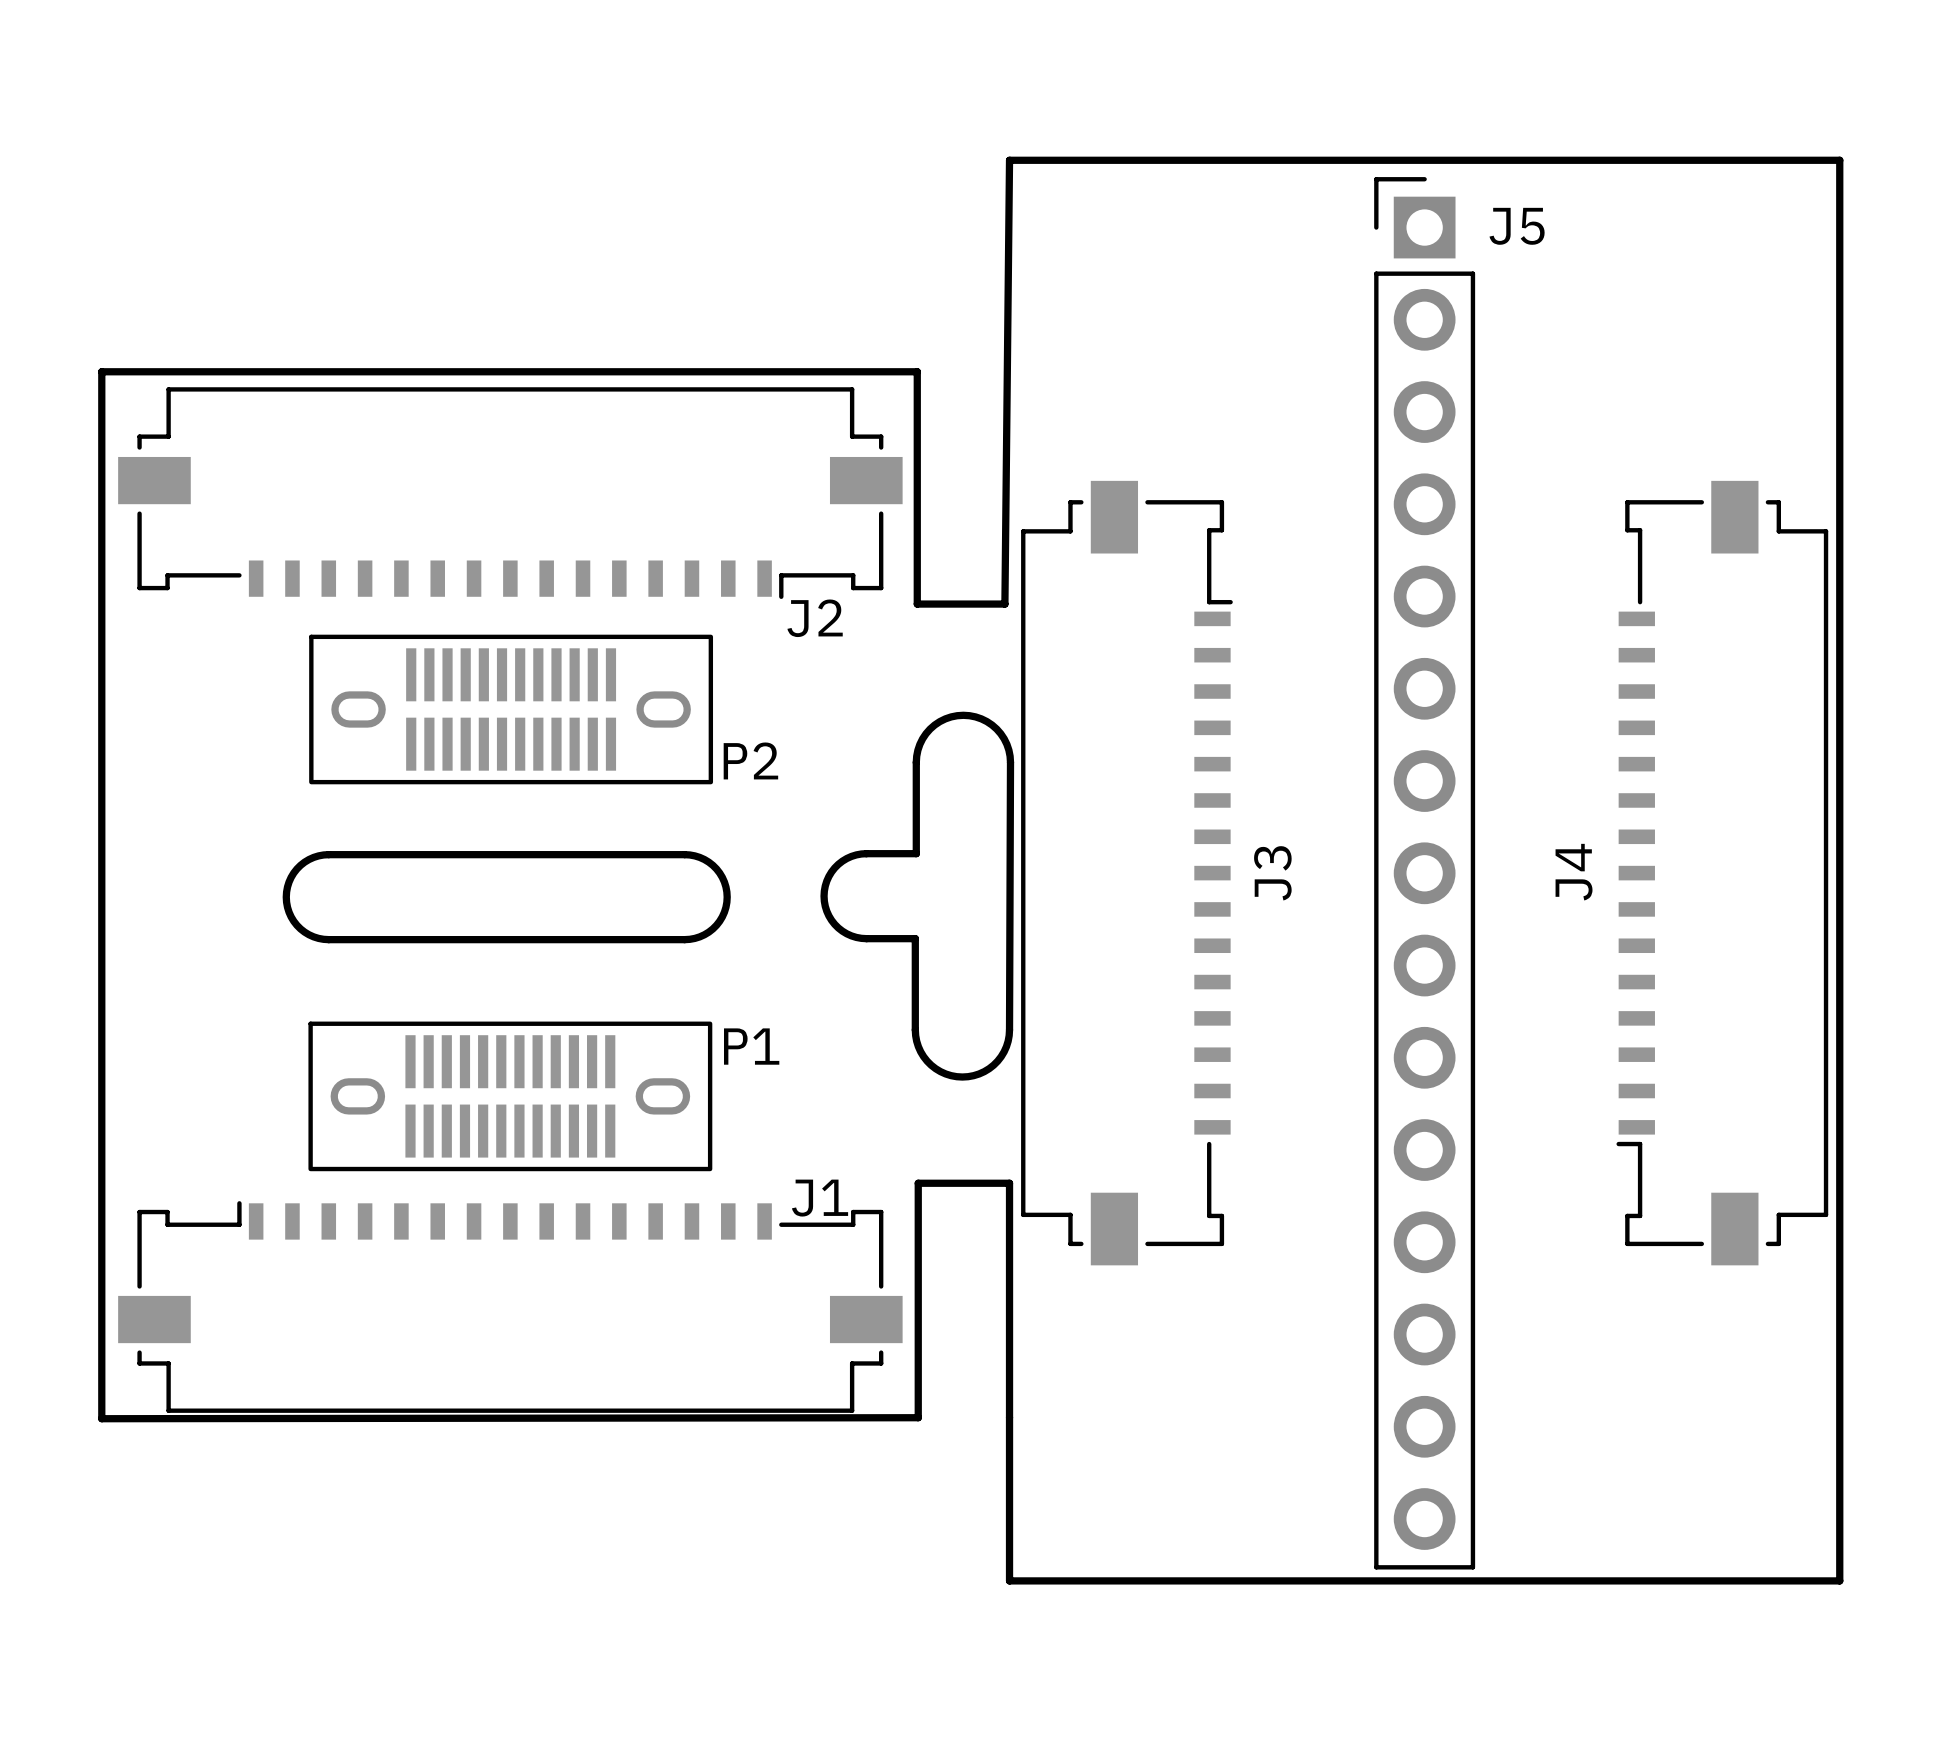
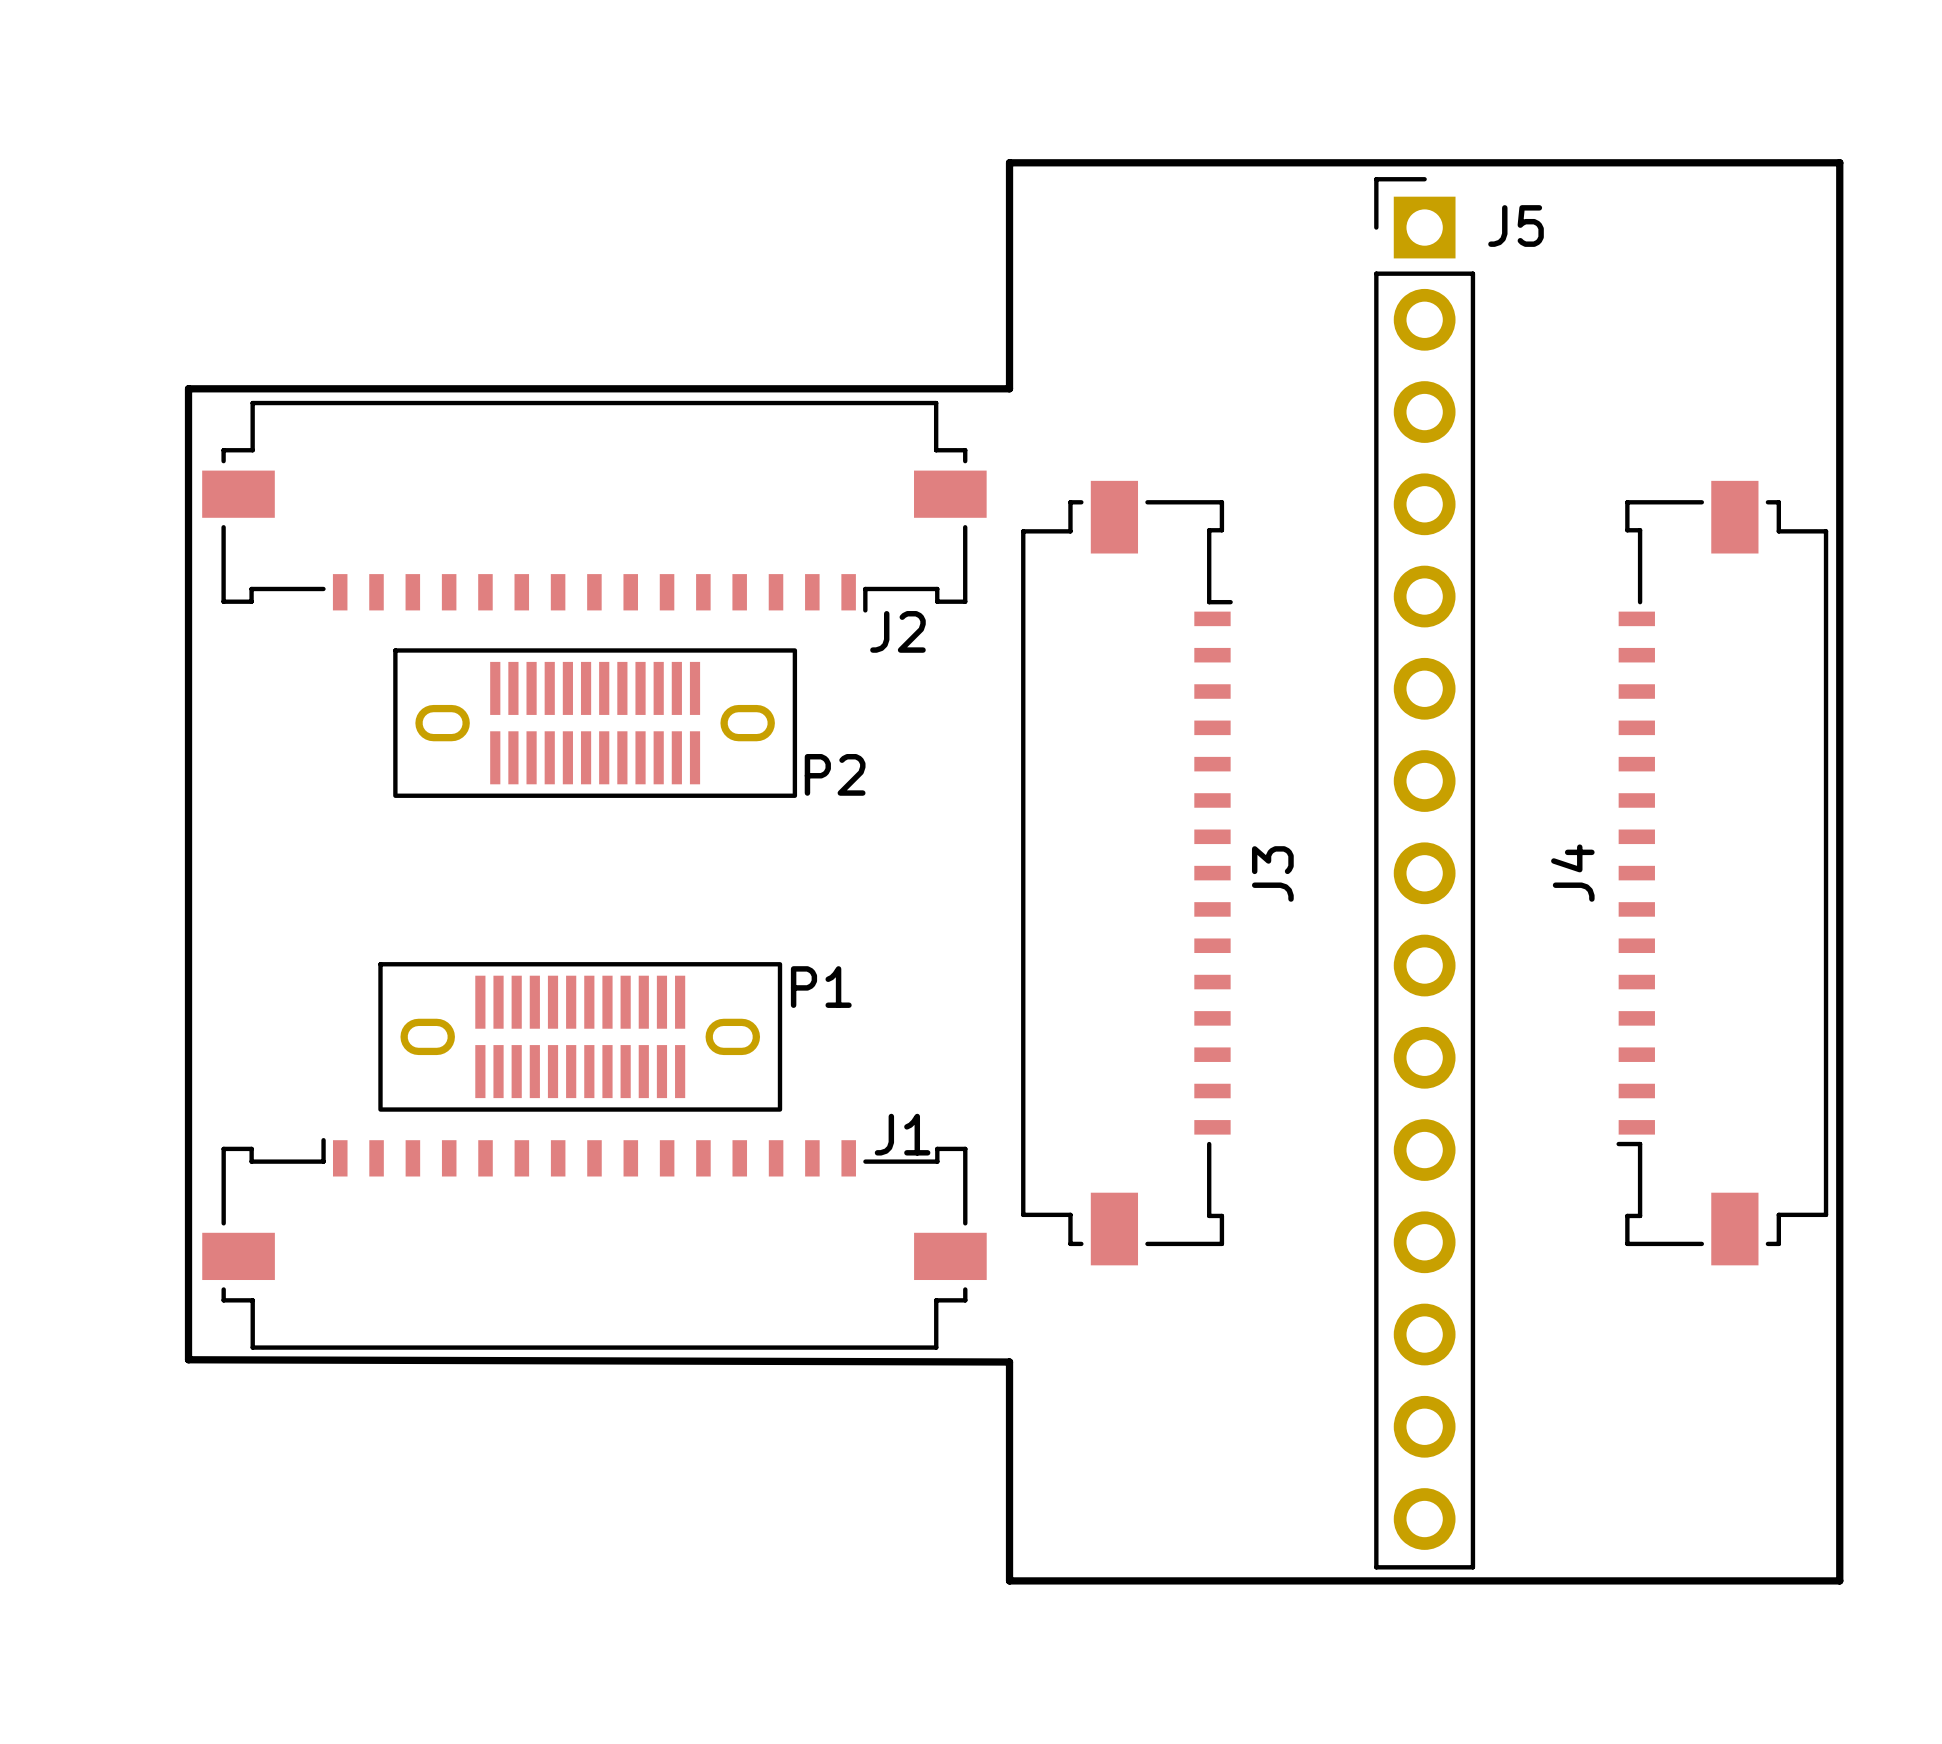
board edge: (1839, 162) (1839, 160) (1009, 160) (1004, 604) (917, 604) (917, 371) (101, 371) (101, 1418) (918, 1417) (918, 1183) (1009, 1183) (1009, 1362) -> (1839, 162) (1009, 162) (1009, 388) (188, 388) (188, 1359) (1009, 1362)
J2 position: (510, 493) -> (594, 506)
P2 position: (511, 709) -> (595, 723)
board edge: (866, 853) (916, 853) (916, 756) (922, 738) (930, 729) (945, 718) (963, 715) (981, 718) (996, 729) (1006, 744) (1010, 762) (1009, 1029) (1008, 1041) (1001, 1056) (984, 1071) (962, 1077) (945, 1073) (931, 1065) (920, 1051) (915, 1029) (915, 938) (856, 937) (838, 927) (828, 915) (825, 906) (824, 891) (831, 872) (846, 858) (856, 854) (861, 853) (866, 853) -> none
board edge: (328, 854) (689, 854) (708, 862) (719, 873) (725, 886) (726, 902) (722, 916) (716, 925) (704, 934) (689, 939) (323, 939) (309, 934) (296, 925) (289, 912) (286, 897) (289, 882) (296, 868) (313, 857) (328, 854) -> none
P1 position: (510, 1096) -> (580, 1036)
J1 position: (510, 1306) -> (594, 1243)

